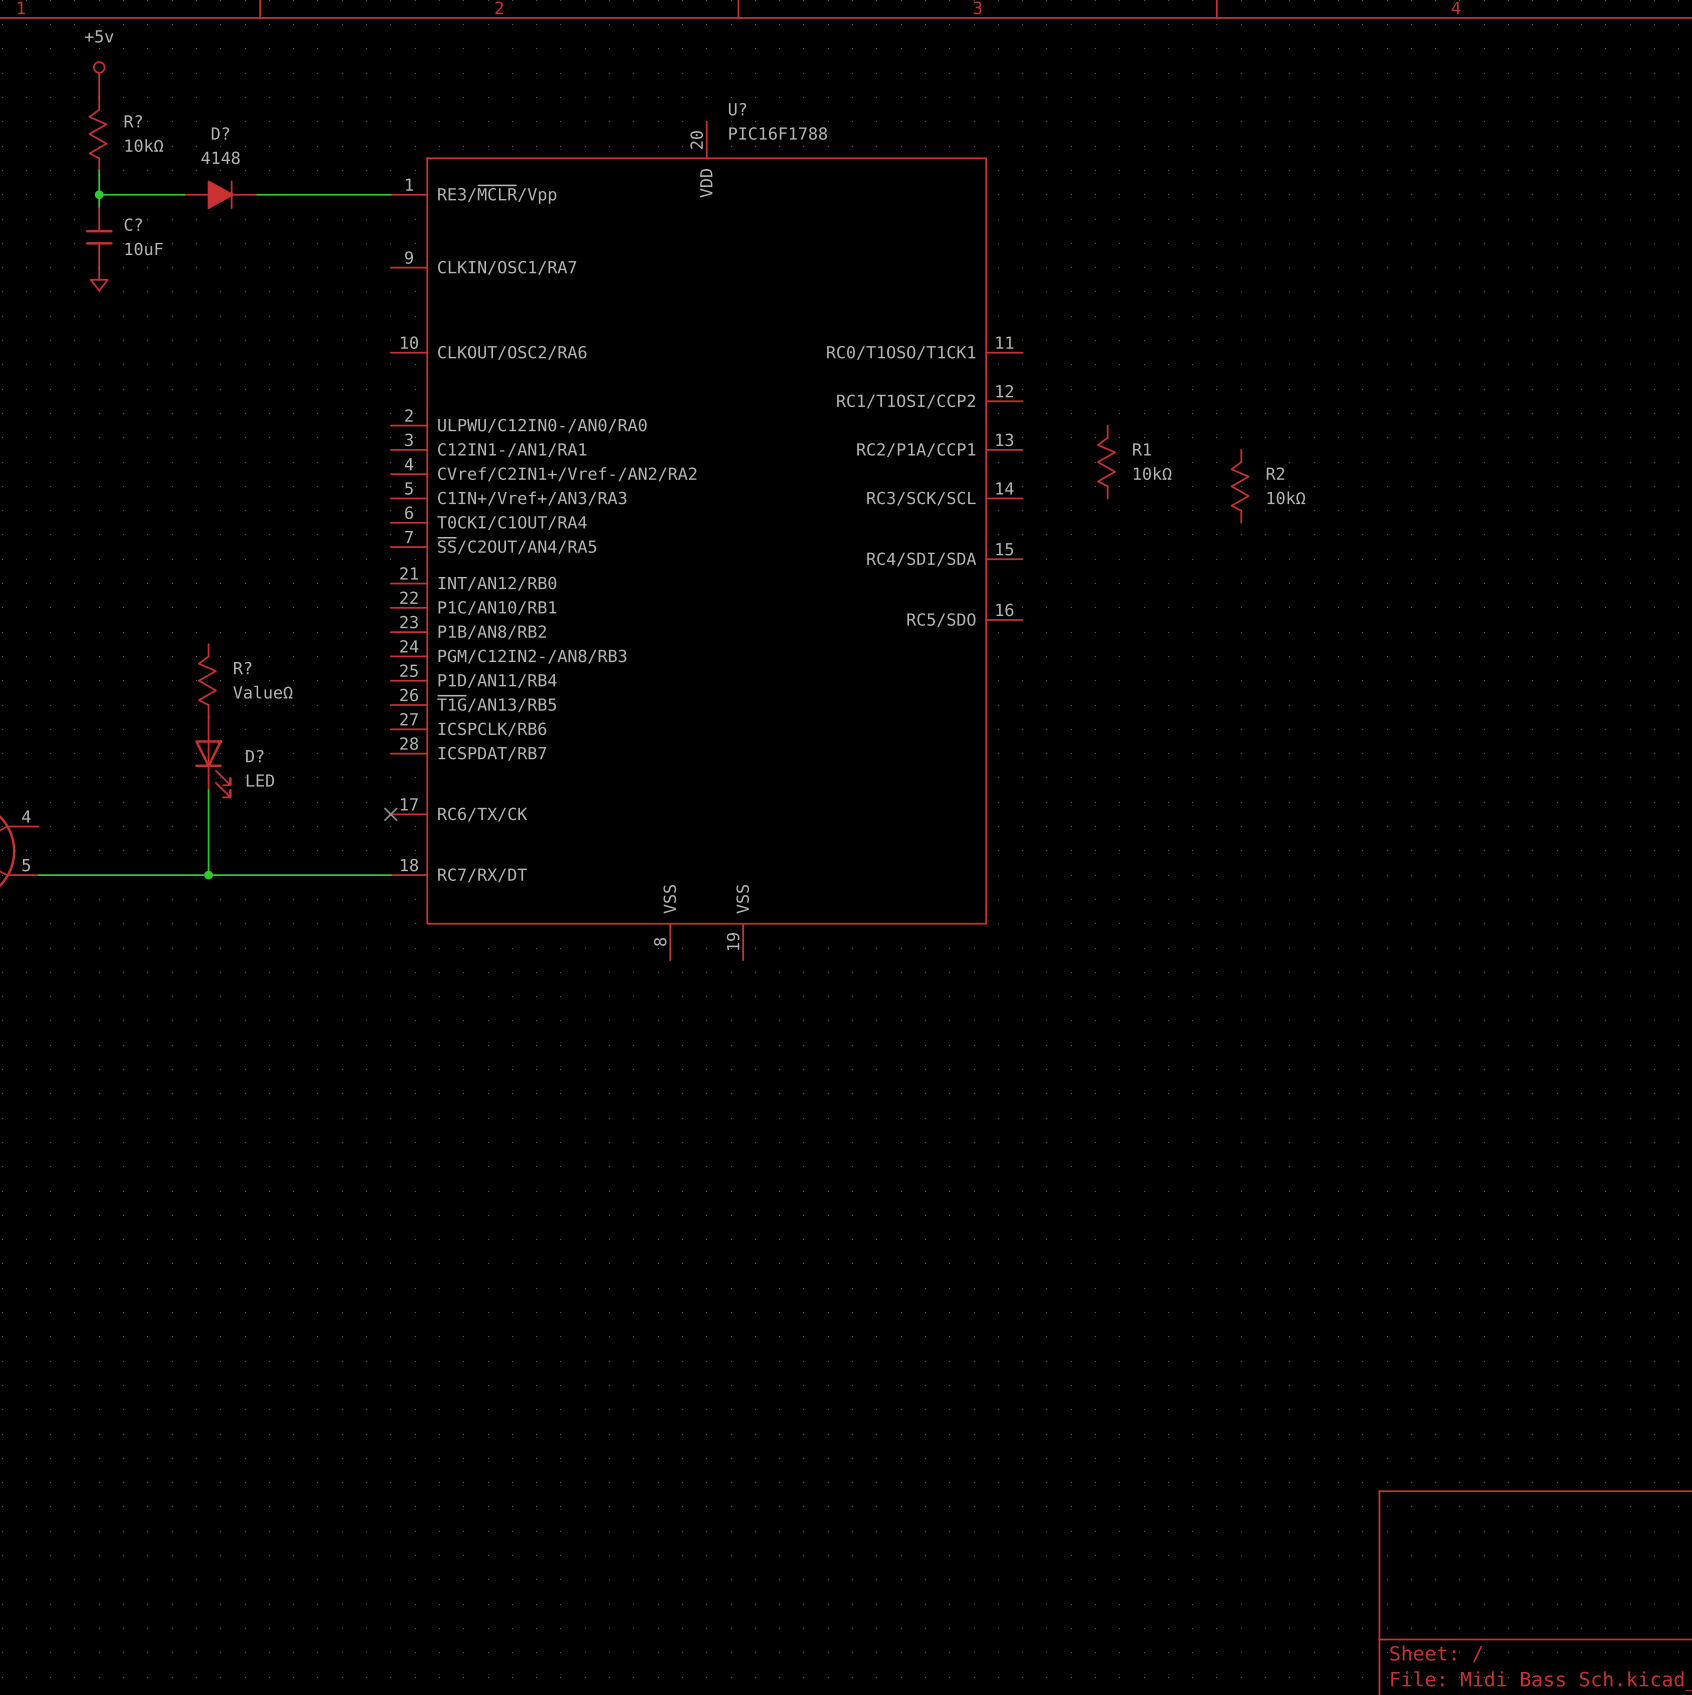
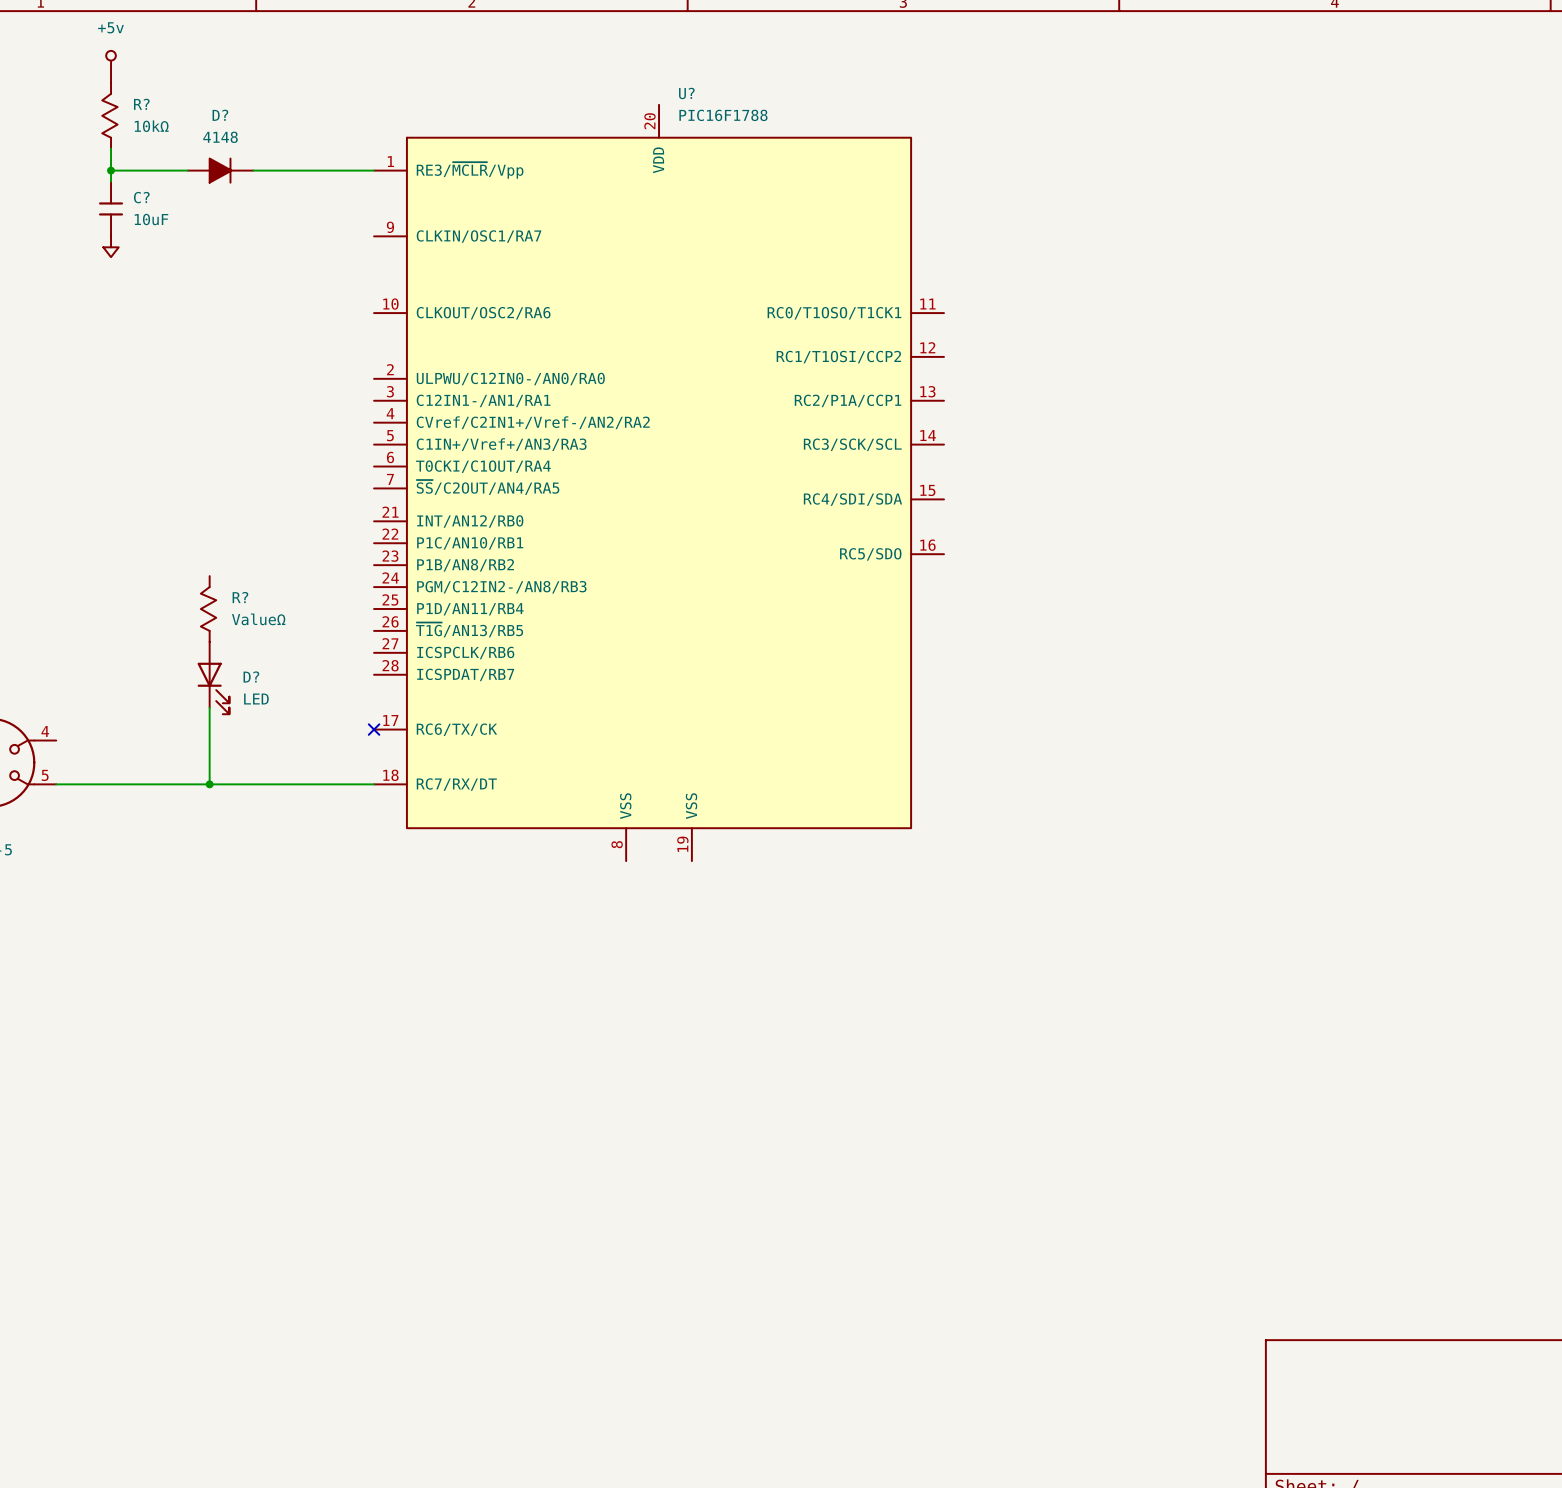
R1: 10kΩ (1106, 462) -> none
R2: 10kΩ (1240, 486) -> none

